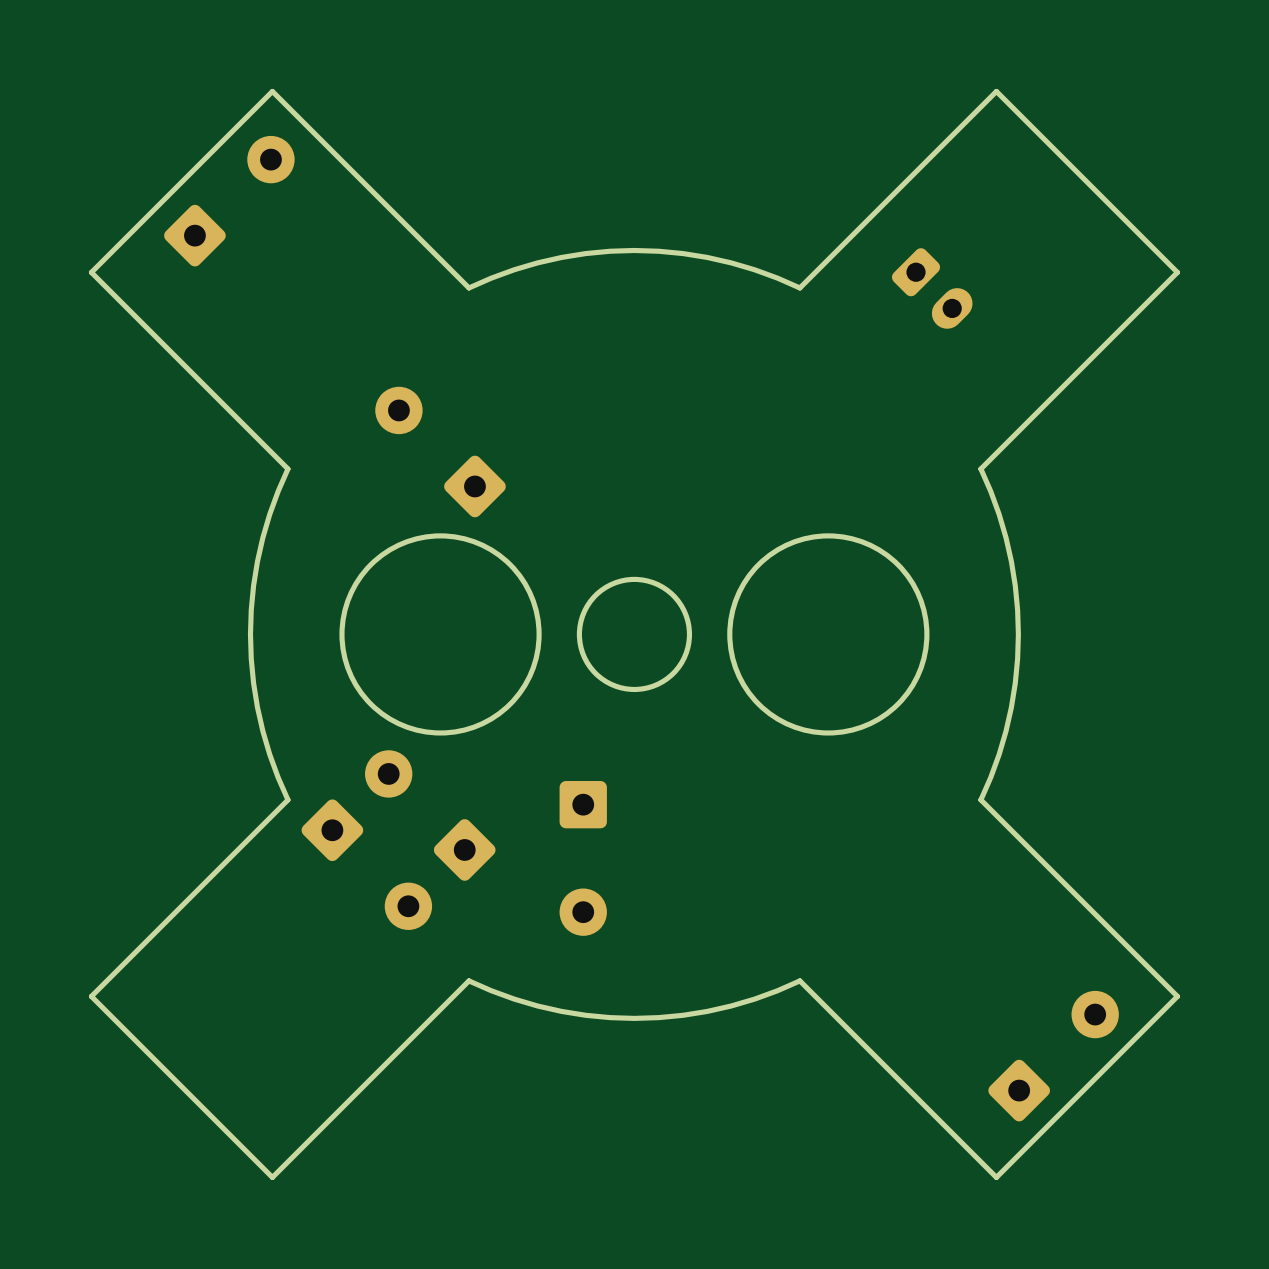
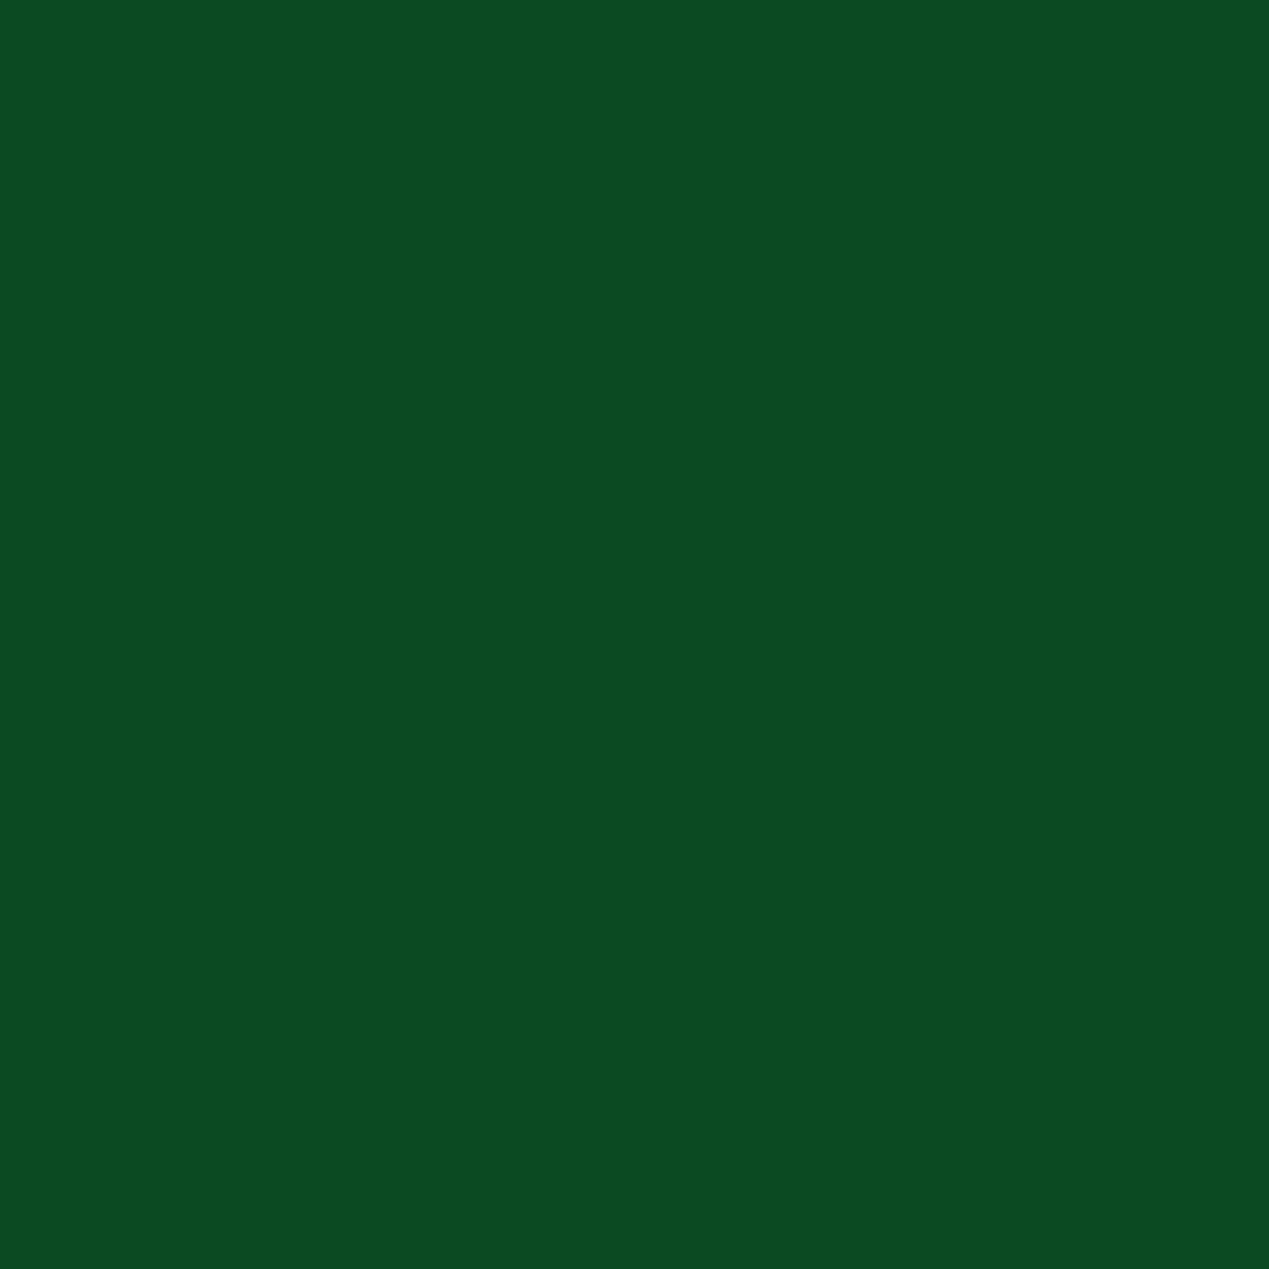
board edge: (996, 91) (1177, 272) (980, 468) (990, 491) (1006, 537) (1015, 585) (1018, 634) (1015, 683) (1006, 731) (999, 754) (980, 799) (1177, 996) (996, 1177) (799, 980) (754, 999) (707, 1011) (683, 1015) (634, 1018) (585, 1015) (561, 1011) (514, 999) (468, 980) (272, 1177) (91, 996) (287, 799) (278, 777) (262, 731) (253, 683) (250, 634) (253, 585) (257, 561) (269, 514) (287, 468) (91, 272) (272, 91) (468, 287) (514, 269) (561, 257) (585, 253) (634, 250) (683, 253) (731, 262) (777, 278) (799, 287) (996, 91) -> none
part: (229, 201) -> none
part: (932, 288) -> none
part: (440, 452) -> none
round board edge: [339, 533, 542, 736] -> none
round board edge: [727, 533, 930, 736] -> none
round board edge: [576, 576, 693, 693] -> none
part: (430, 815) -> none
part: (583, 858) -> none
part: (366, 864) -> none
part: (1053, 1056) -> none

